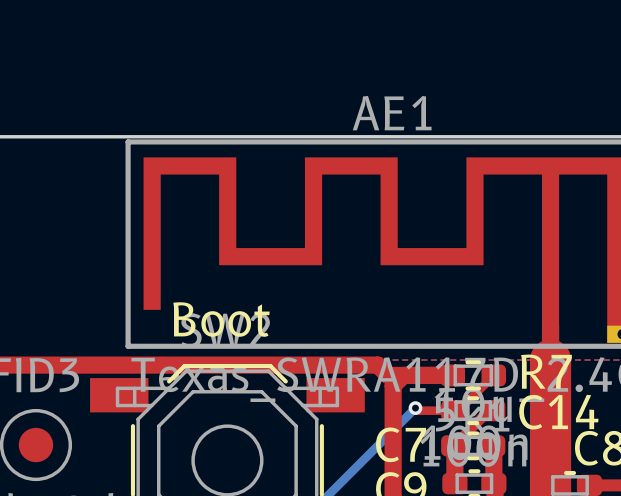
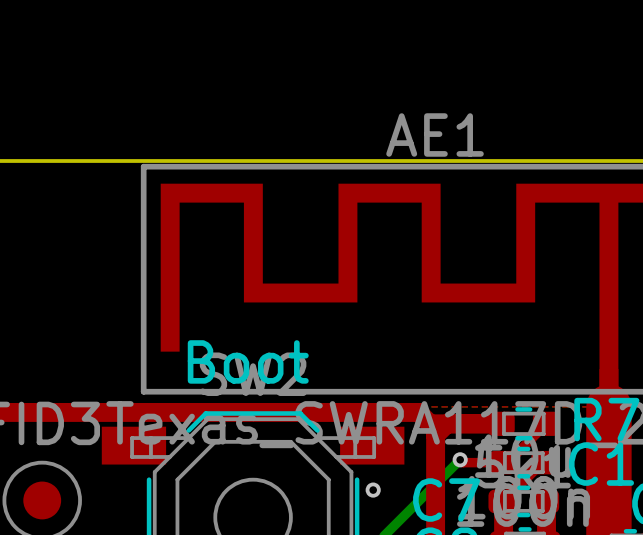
via: none -> (373, 490)

